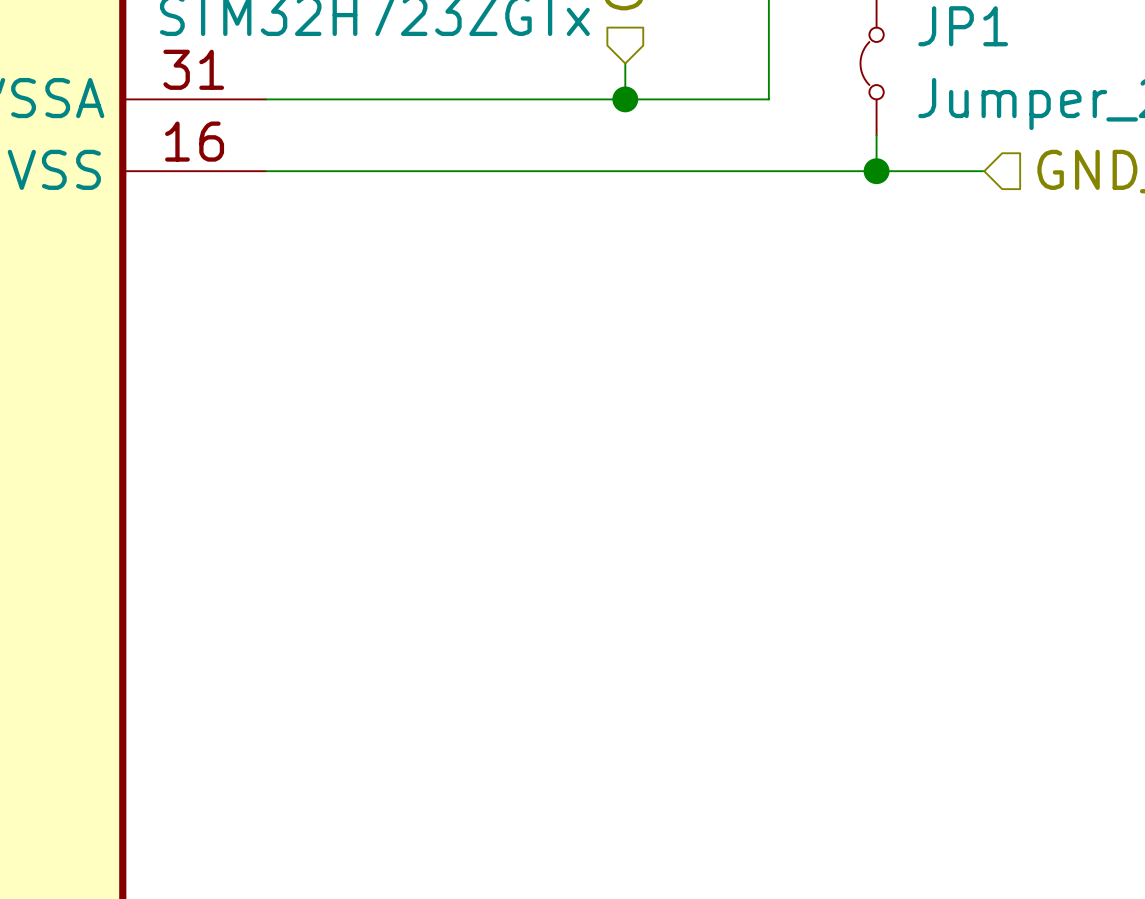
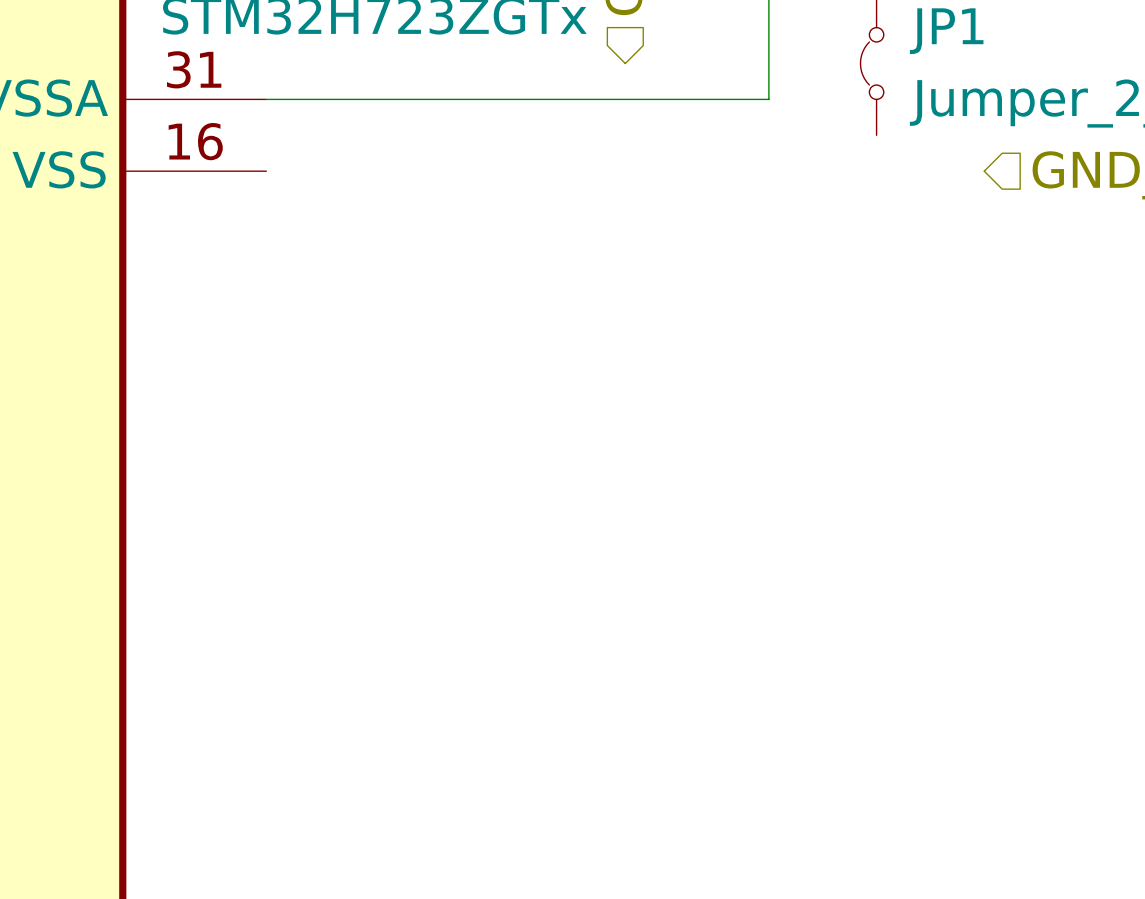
wire: (625, 63) (625, 99) -> none
junction: (625, 99) -> none
wire: (876, 135) (876, 171) -> none
wire: (266, 171) (984, 171) -> none
junction: (876, 171) -> none

